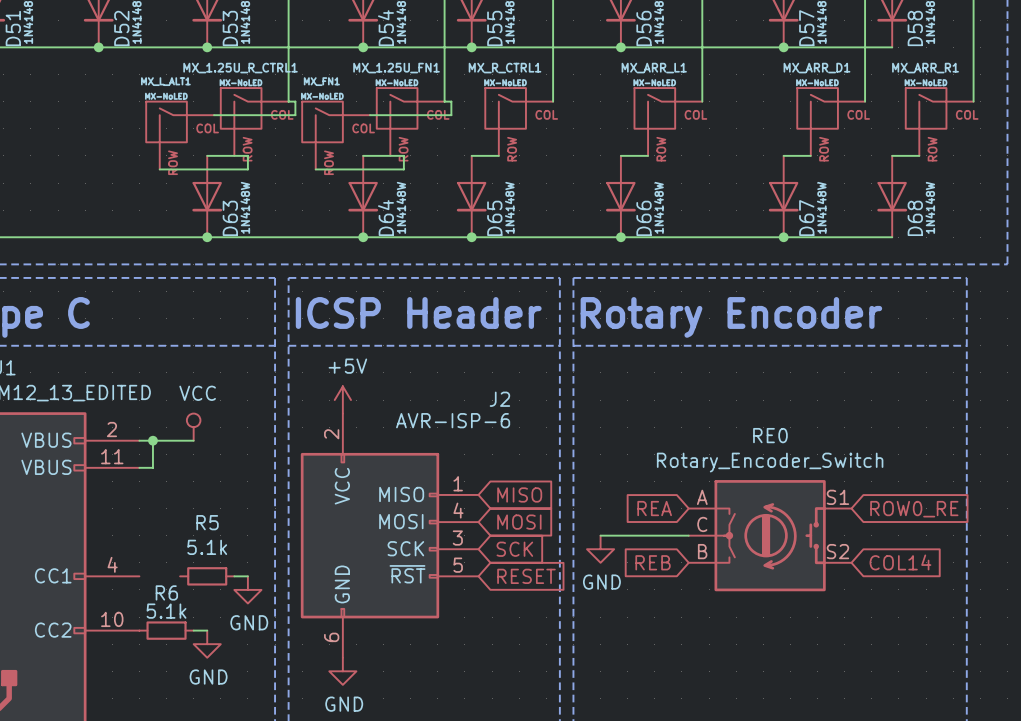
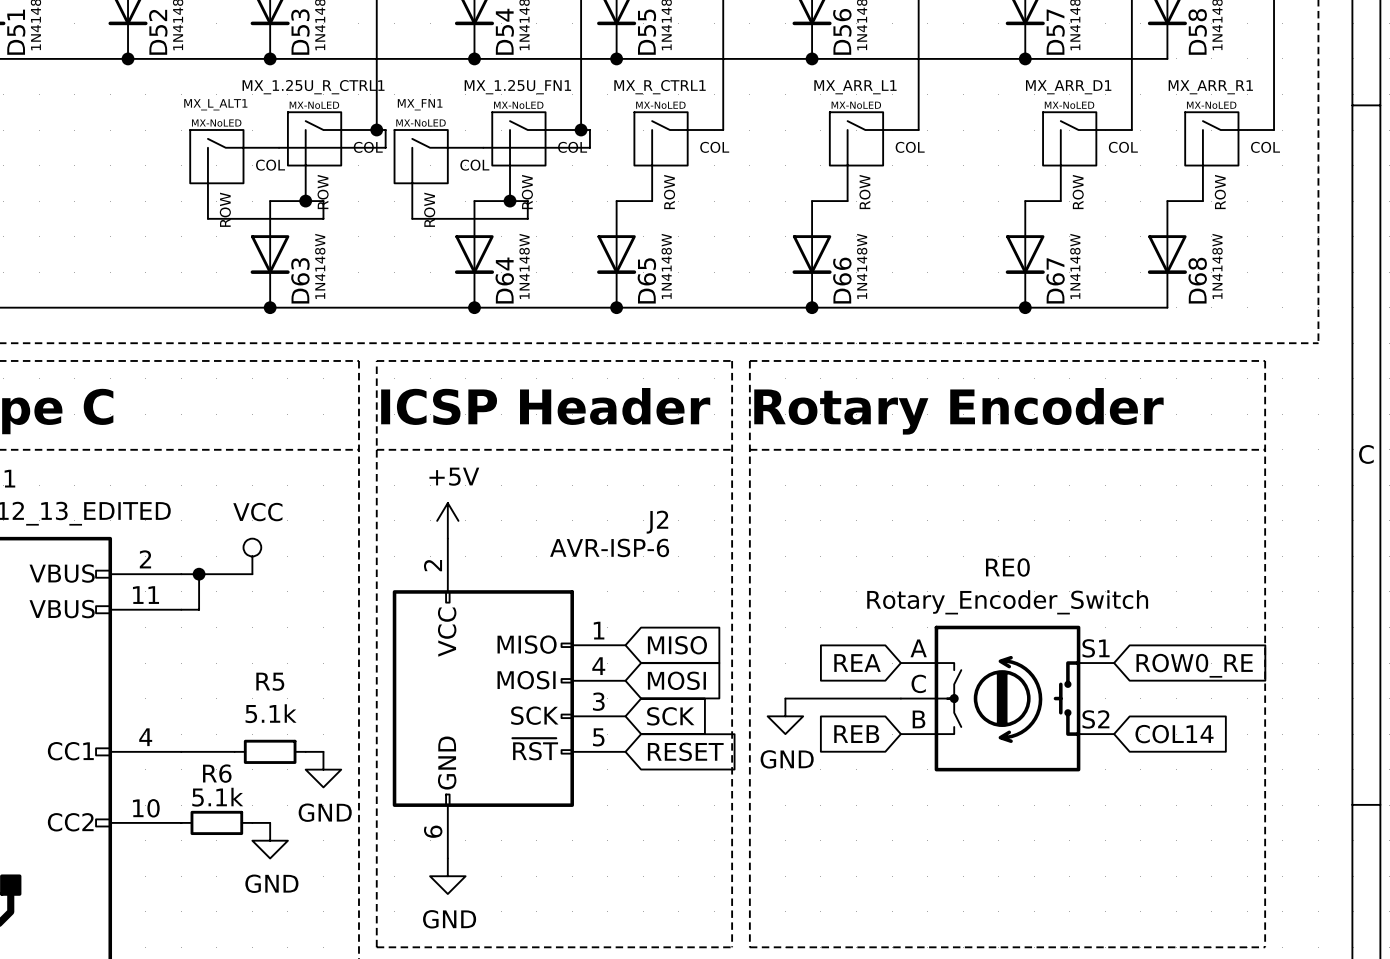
junction: none -> (376, 130)
junction: none -> (581, 130)
junction: none -> (305, 201)
junction: none -> (510, 201)
wire: none -> (181, 751) (234, 751)

